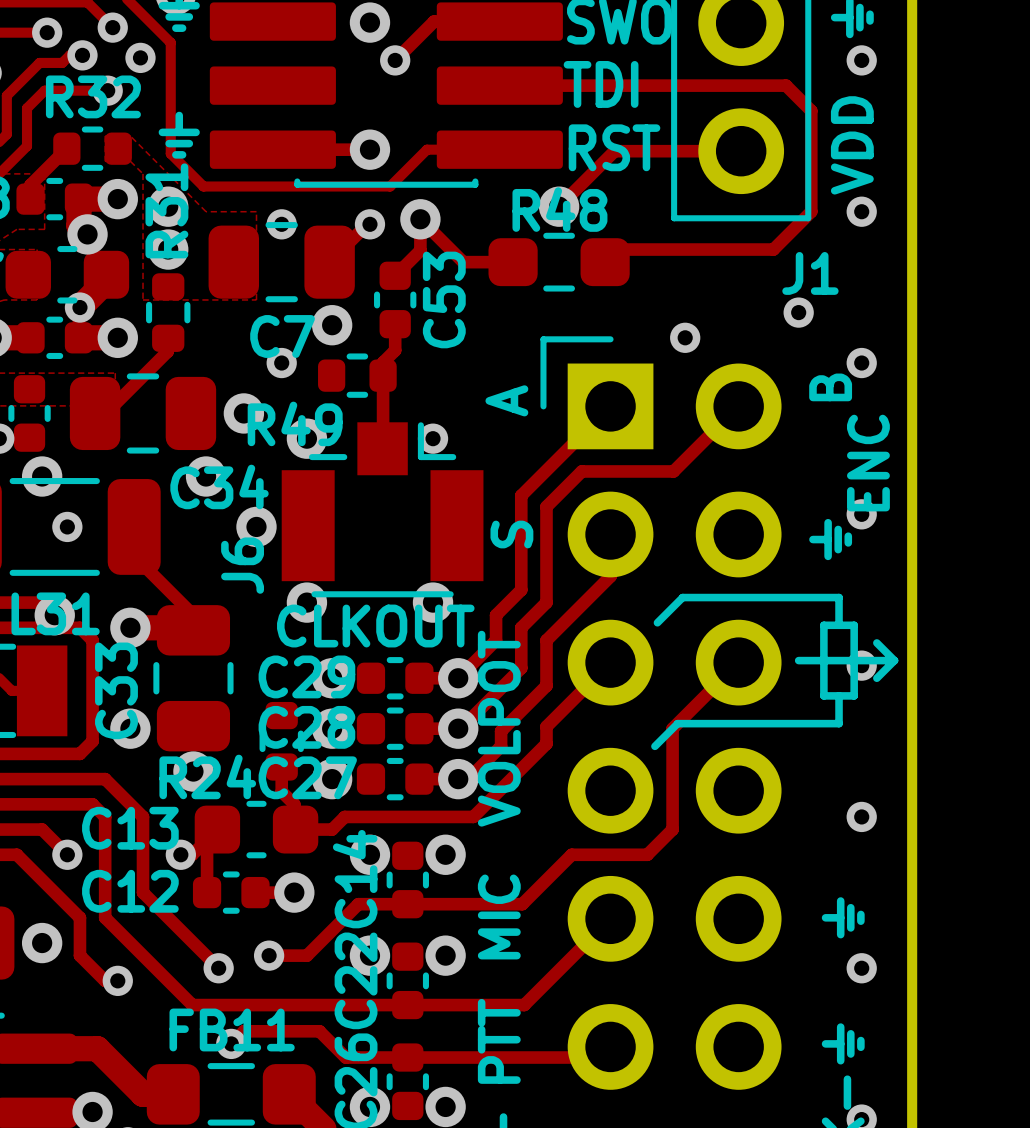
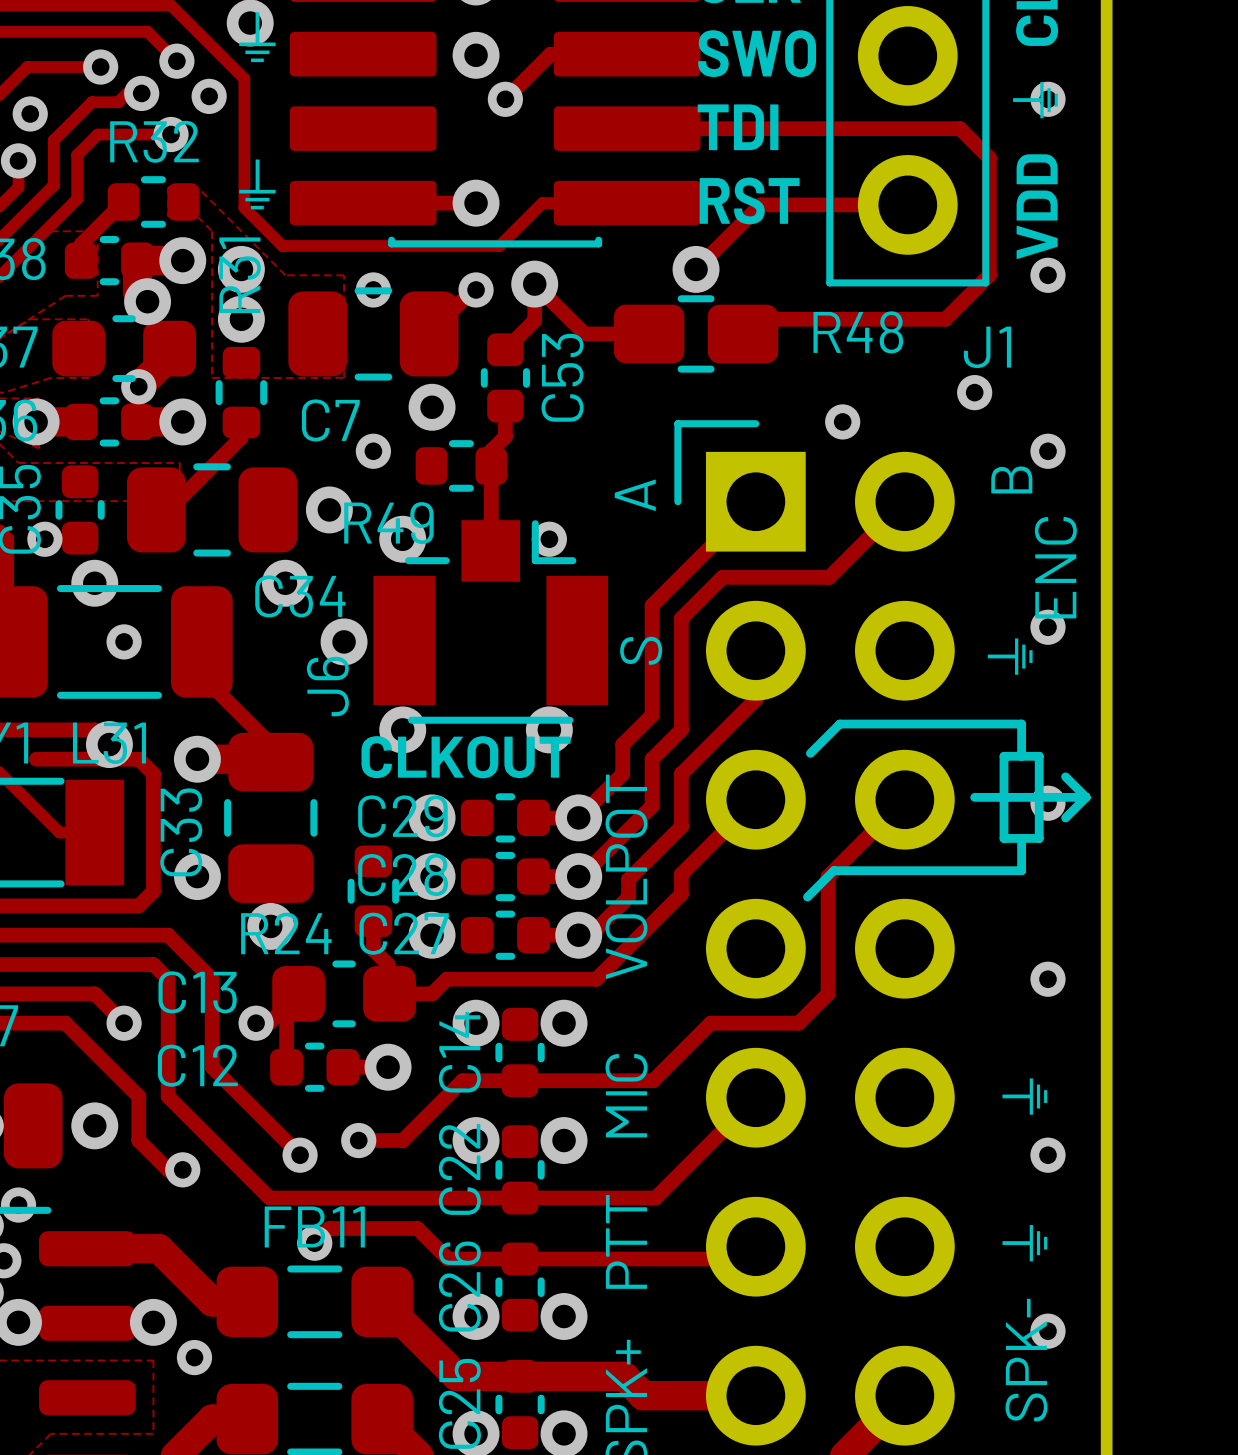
R48 name position: R48 (559, 209) -> R48 (858, 332)
R48 footprint: [488, 232, 630, 292] -> [613, 295, 779, 373]
C7 name position: C7 (282, 336) -> C7 (330, 420)

